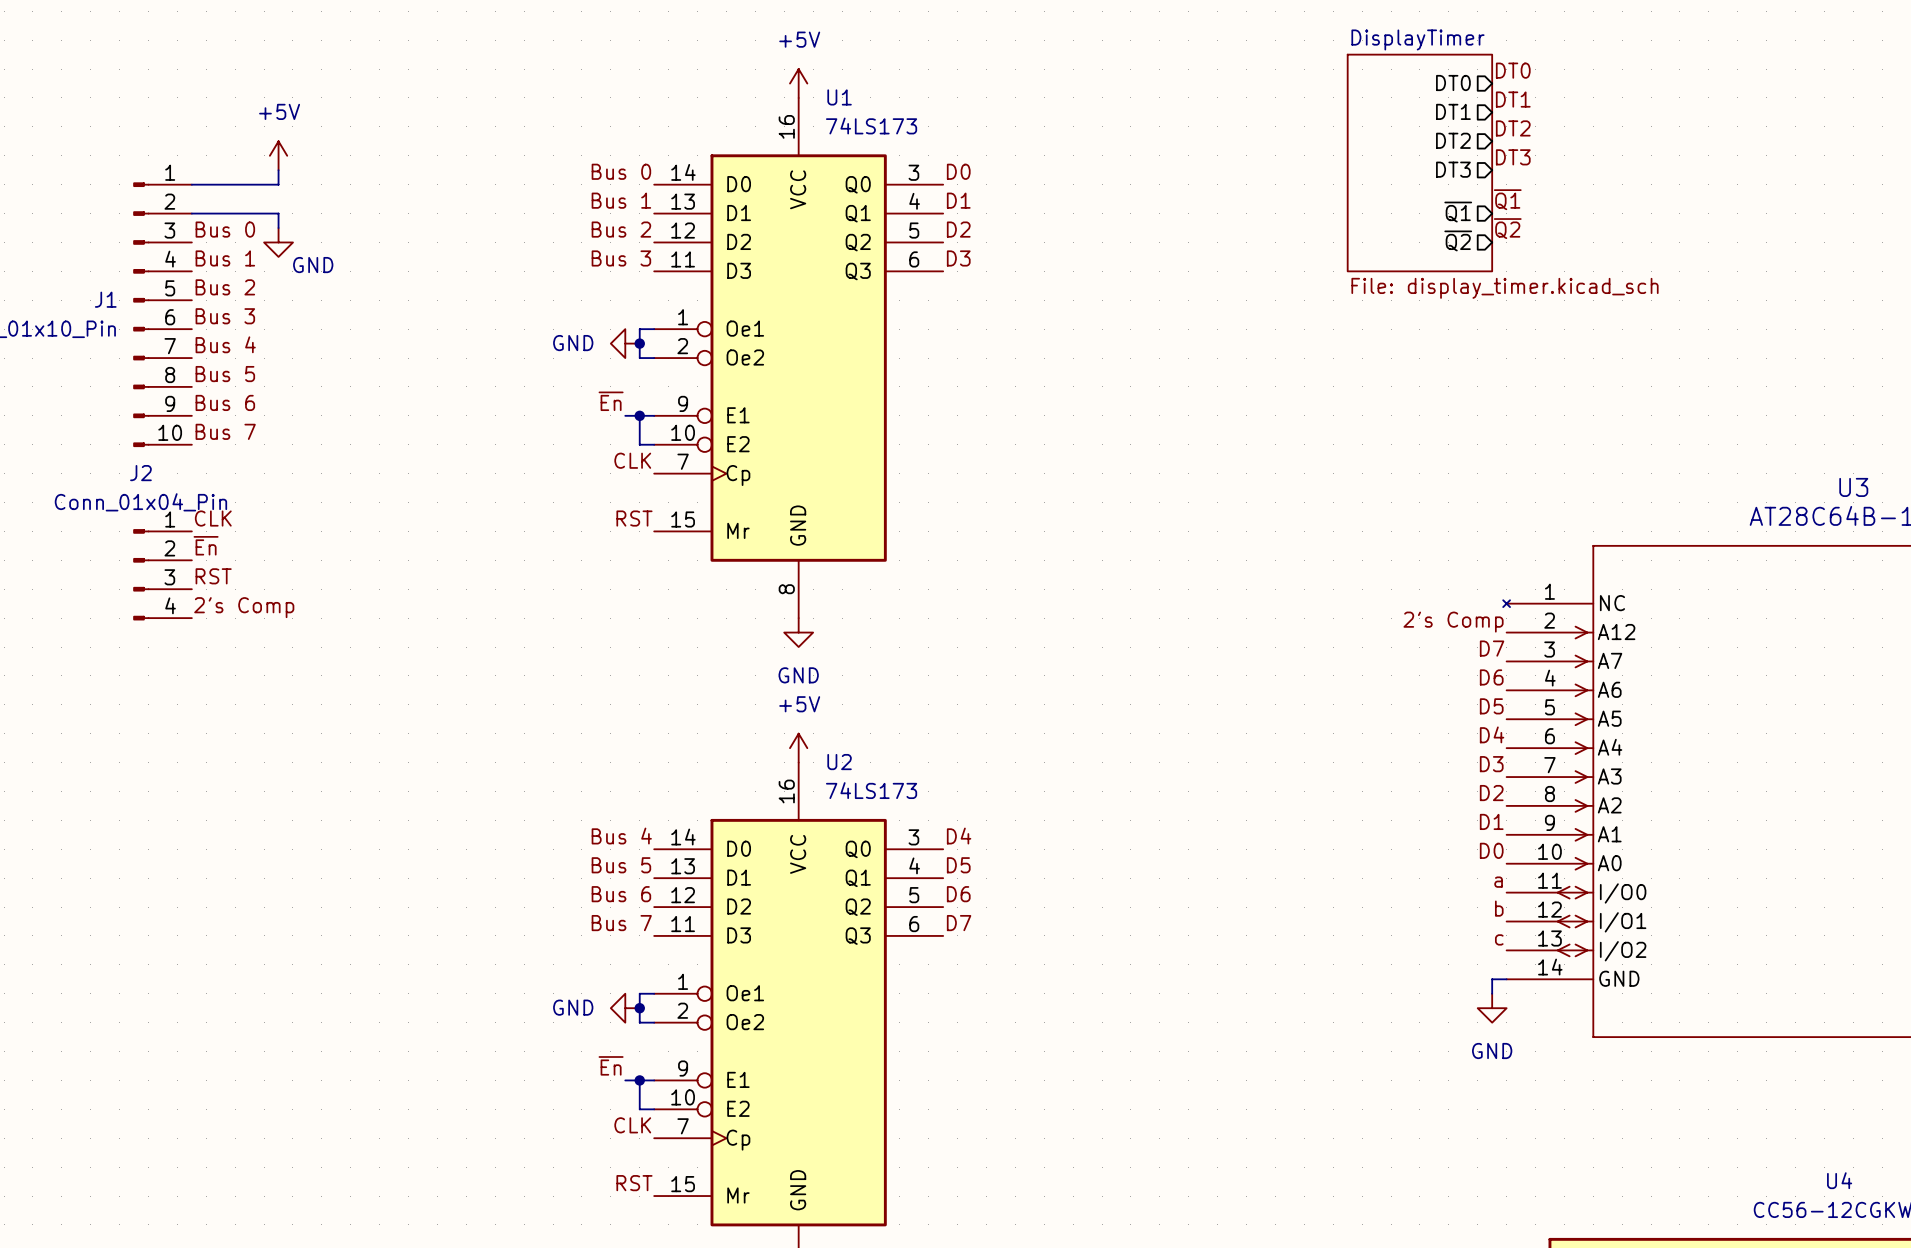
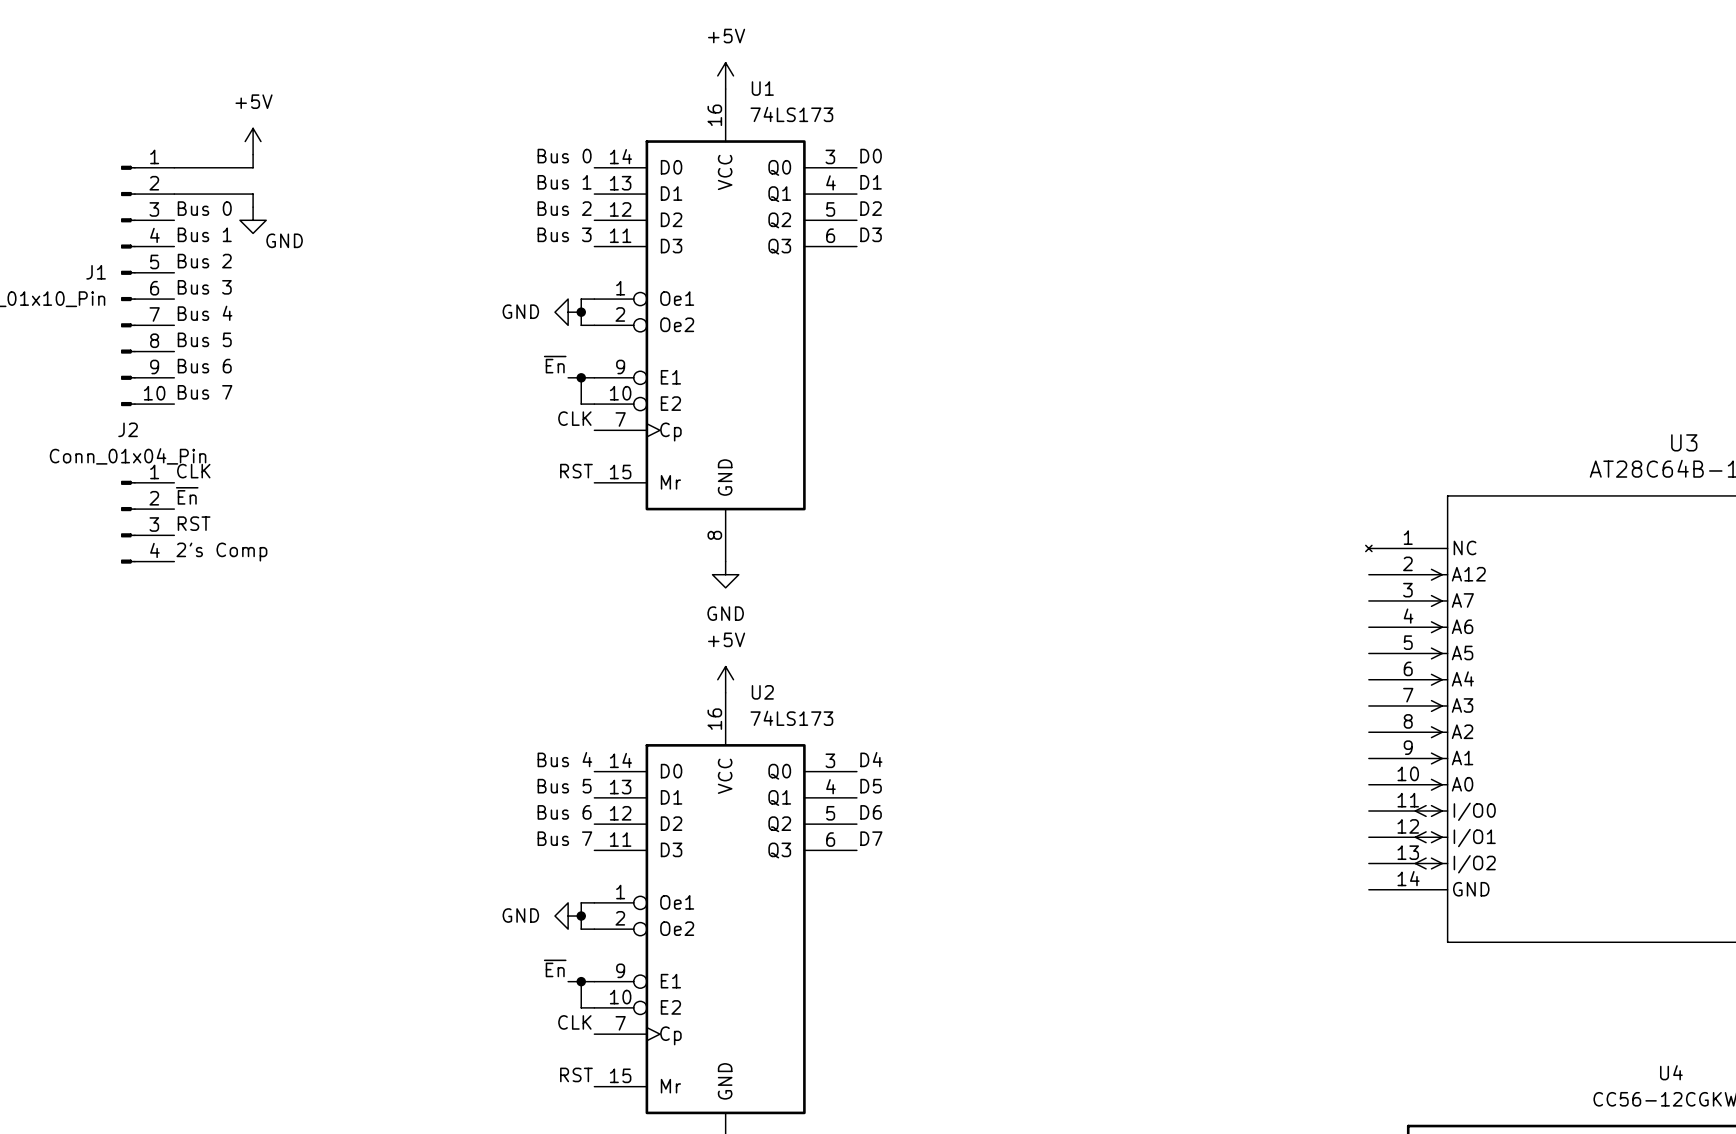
label: DT0 (1513, 70) -> none
sheet pin: DT0 (1453, 83) -> none
label: DT1 (1513, 99) -> none
sheet pin: DT1 (1453, 111) -> none
label: DT2 (1513, 128) -> none
sheet pin: DT2 (1453, 140) -> none
label: DT3 (1513, 157) -> none
sheet DisplayTimer: File: display_timer.kicad_sch (1419, 163) -> none
sheet pin: DT3 (1453, 169) -> none
label: ~{Q1} (1507, 199) -> none
sheet pin: ~{Q1} (1458, 212) -> none
label: ~{Q2} (1507, 228) -> none
sheet pin: ~{Q2} (1458, 240) -> none
label: 2's Comp (1453, 622) -> none
label: D7 (1492, 648) -> none
label: D6 (1491, 677) -> none
label: D5 (1491, 706) -> none
label: D4 (1492, 734) -> none
label: D3 (1491, 764) -> none
label: D2 (1491, 793) -> none
label: D1 (1491, 821) -> none
label: D0 (1491, 850) -> none
label: a (1498, 882) -> none
label: b (1499, 908) -> none
label: c (1499, 939) -> none
wire: (1506, 979) (1492, 979) (1492, 993) -> none
power symbol: GND (1492, 1008) -> none

